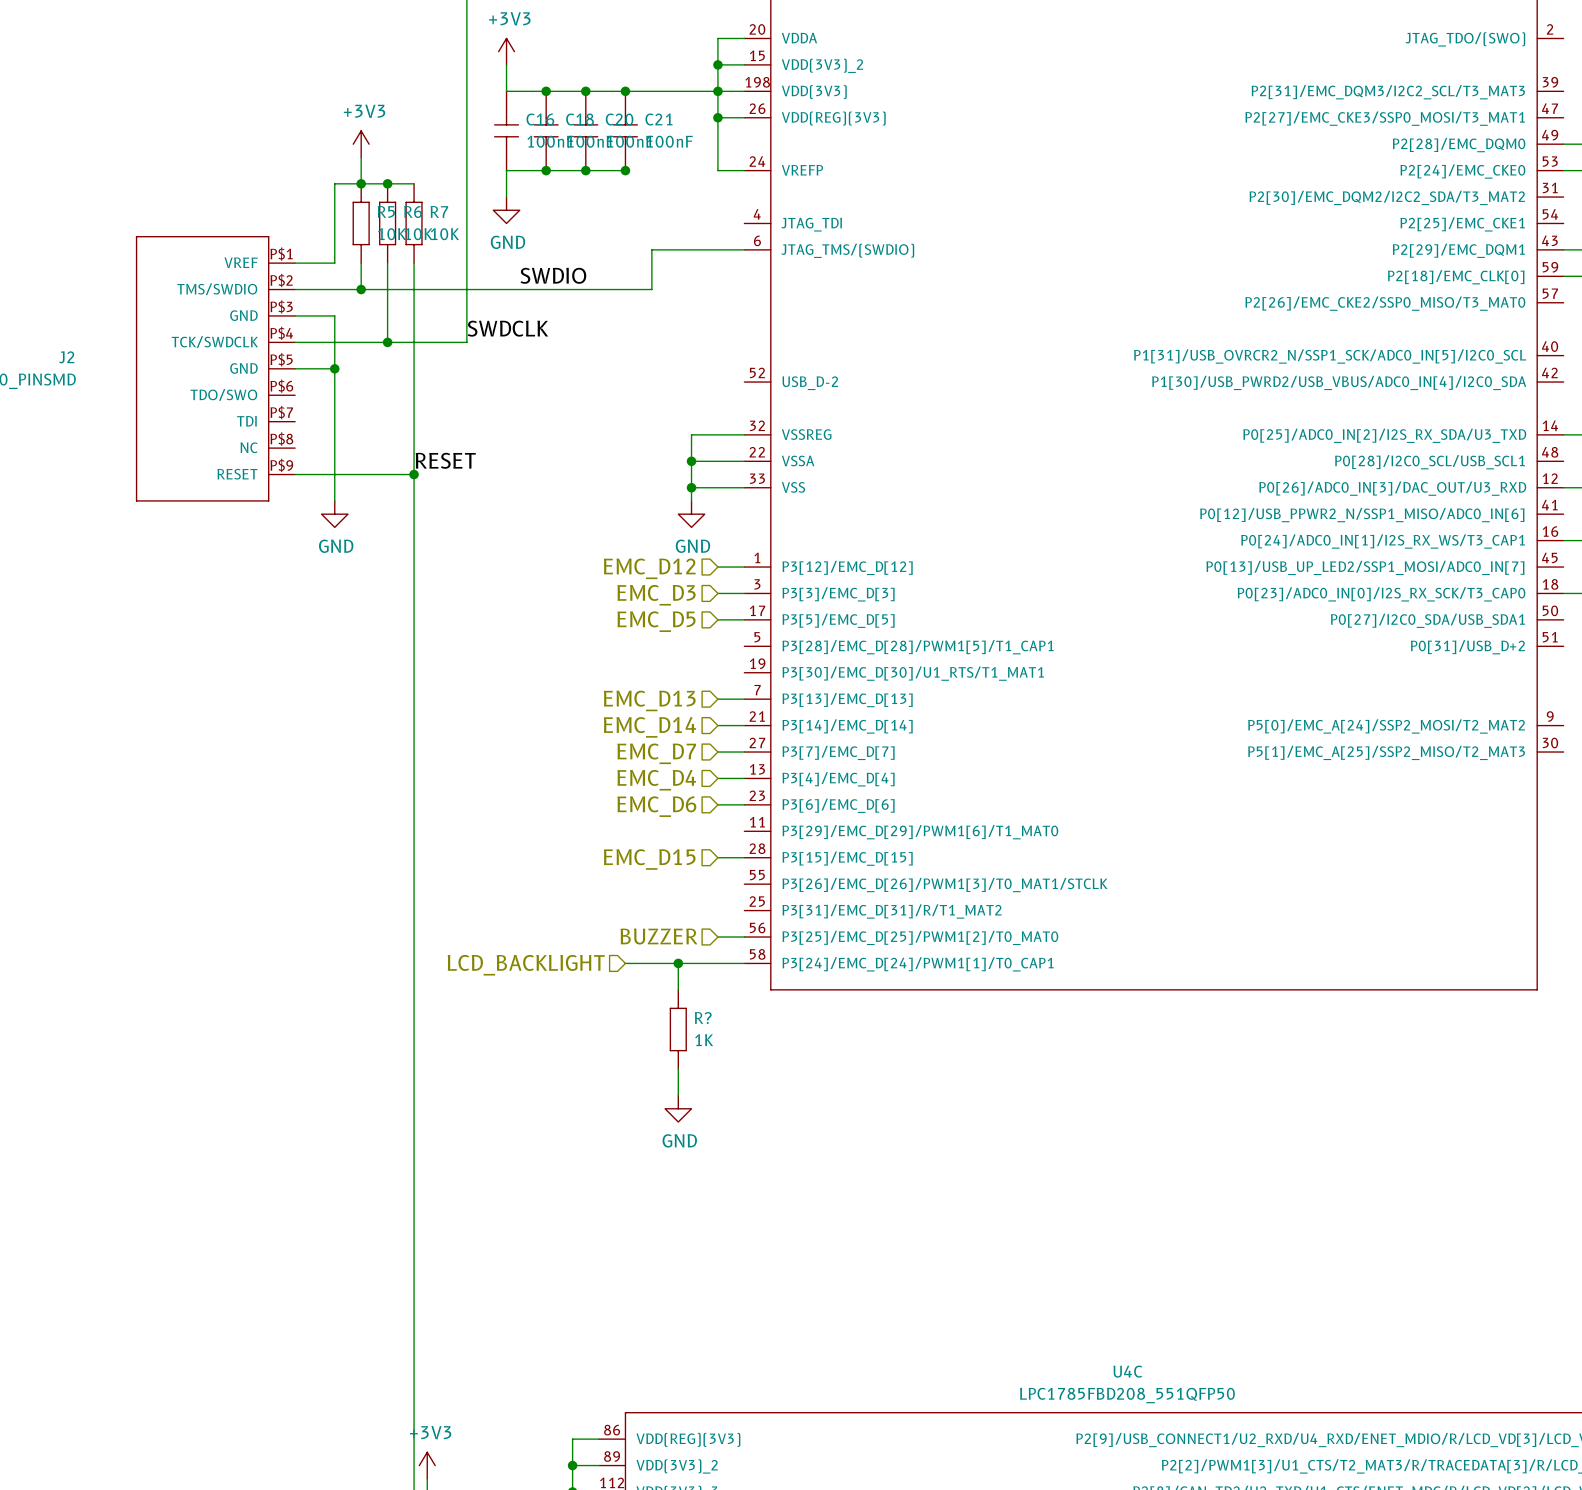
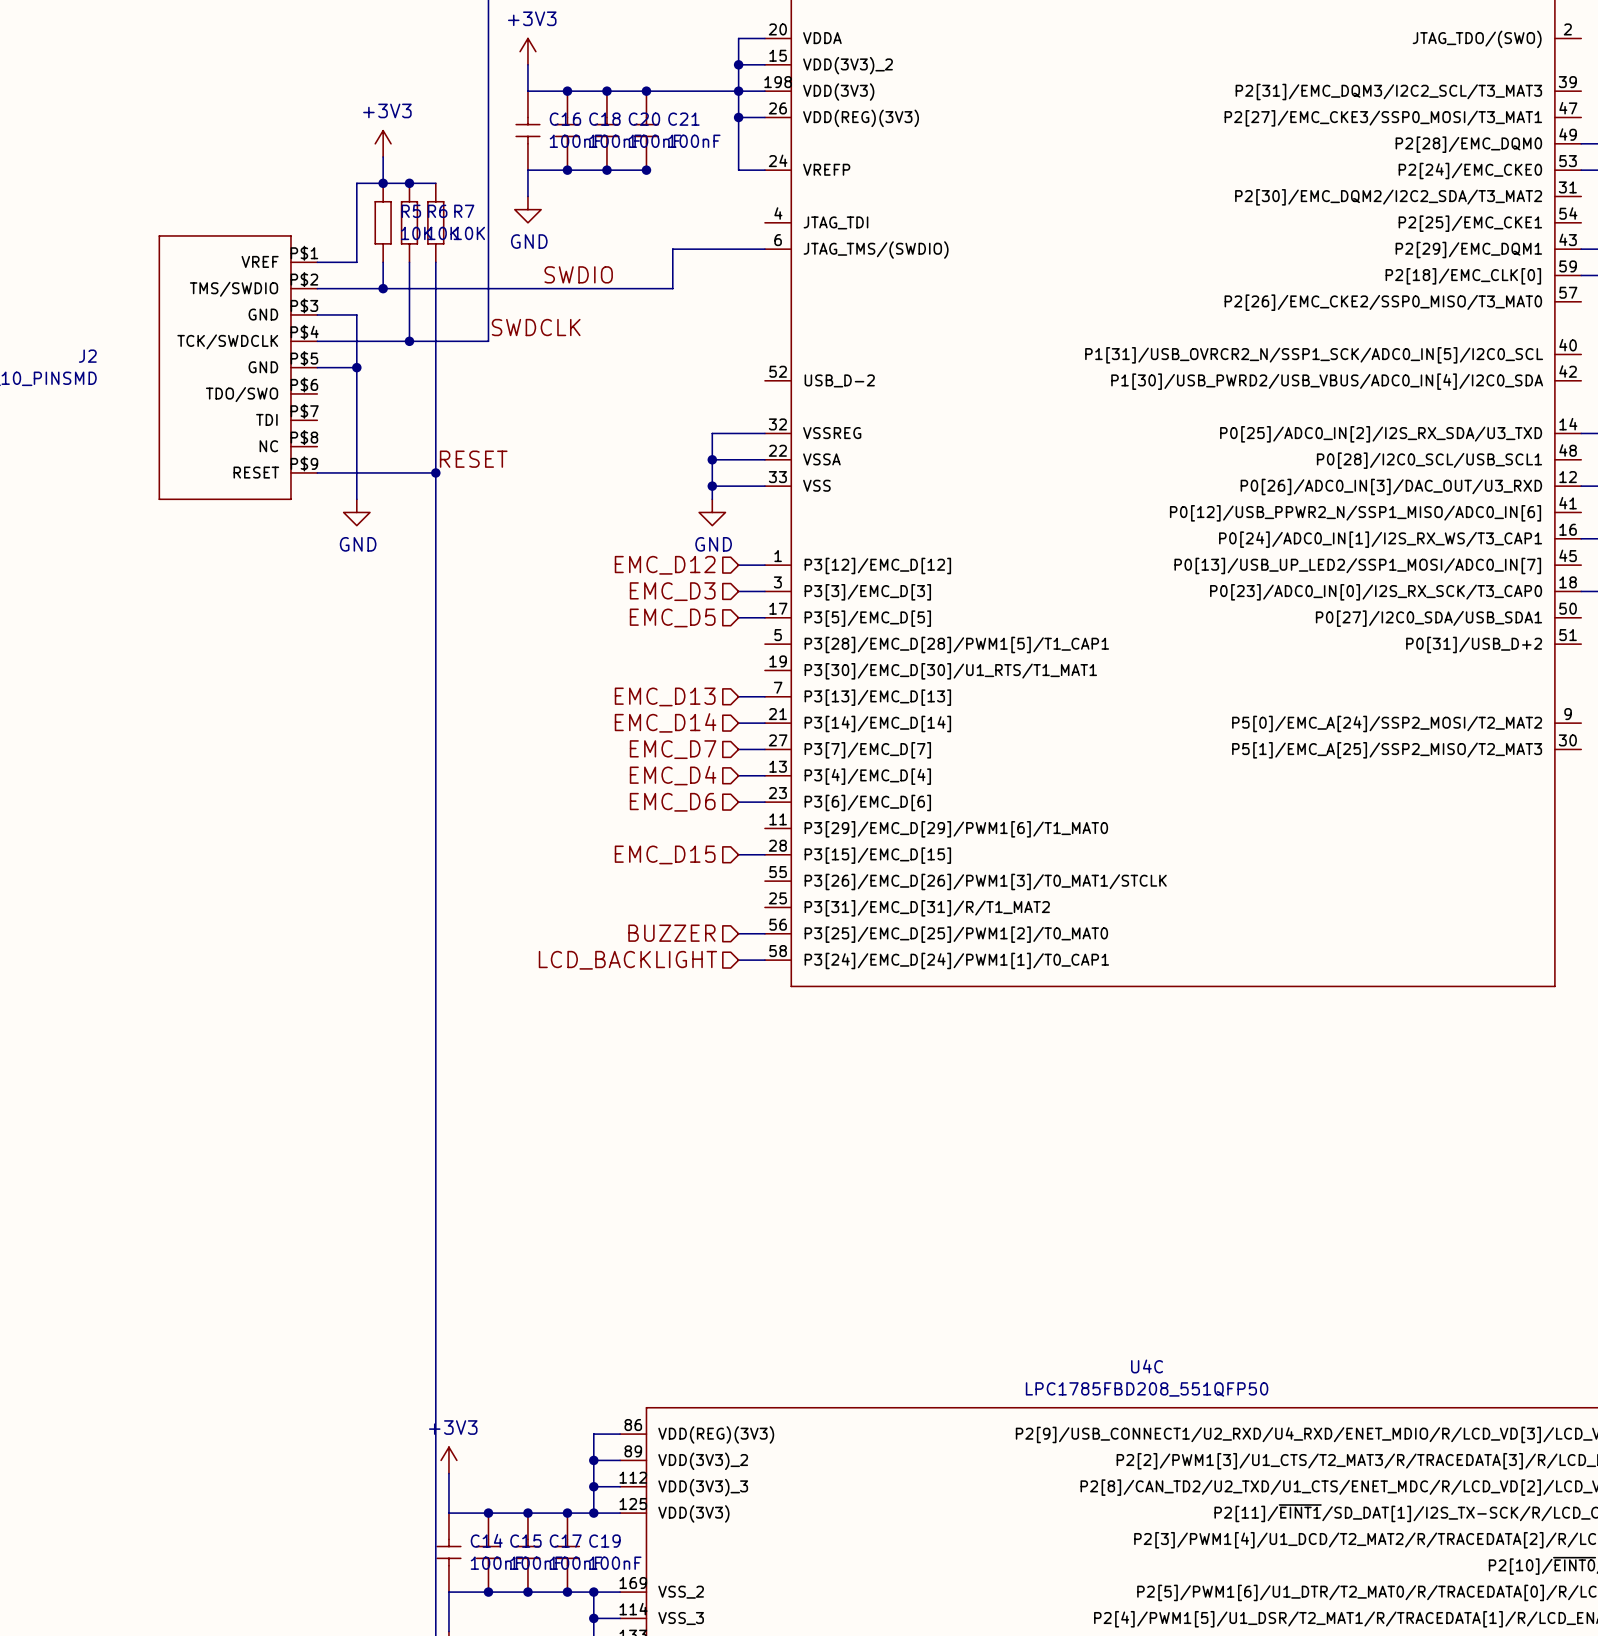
wire: (625, 963) (717, 963) -> none
wire: (678, 963) (678, 989) -> none
junction: (678, 963) -> none
hierarchical label position: LCD_BACKLIGHT (526, 965) -> LCD_BACKLIGHT (627, 960)
R?: 1K (678, 1029) -> none
wire: (678, 1069) (678, 1095) -> none
power symbol: GND (678, 1108) -> none

